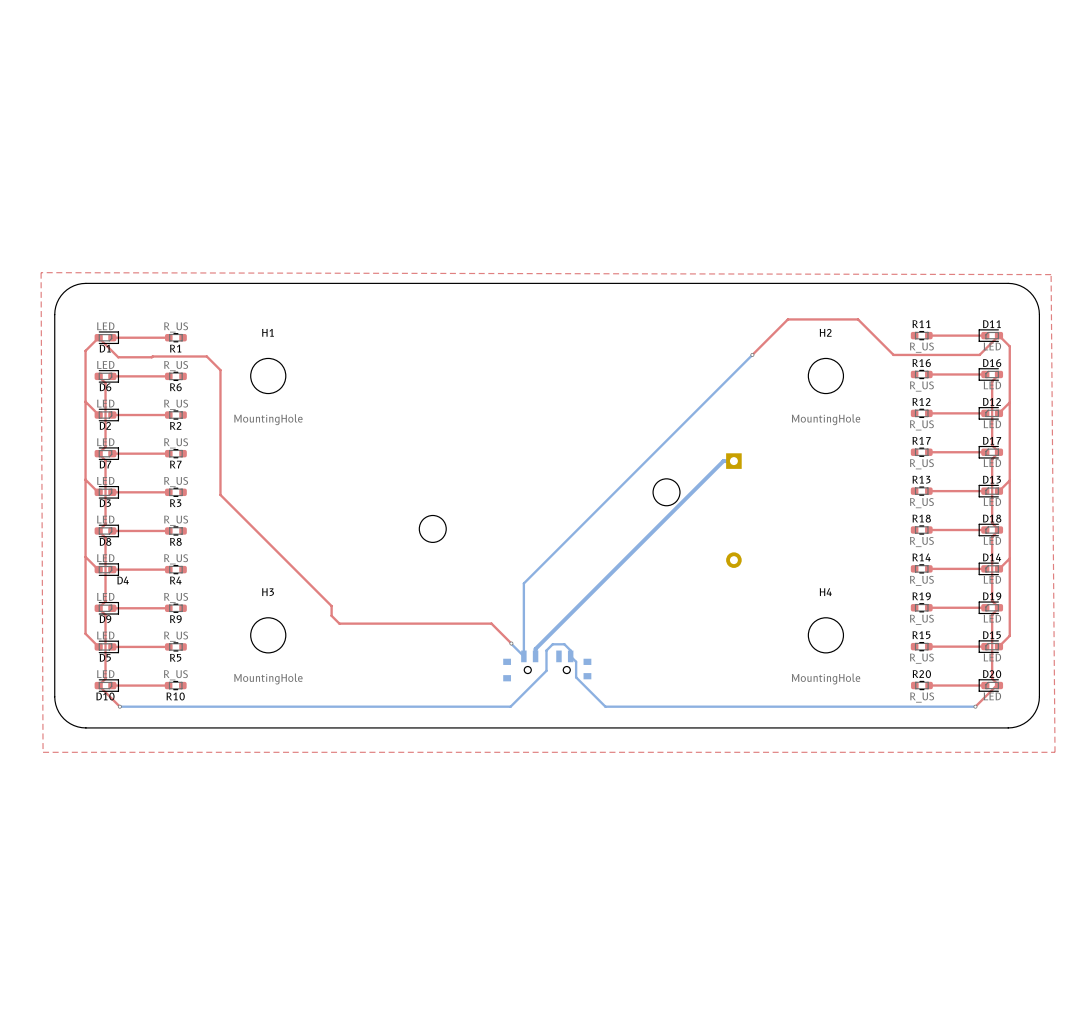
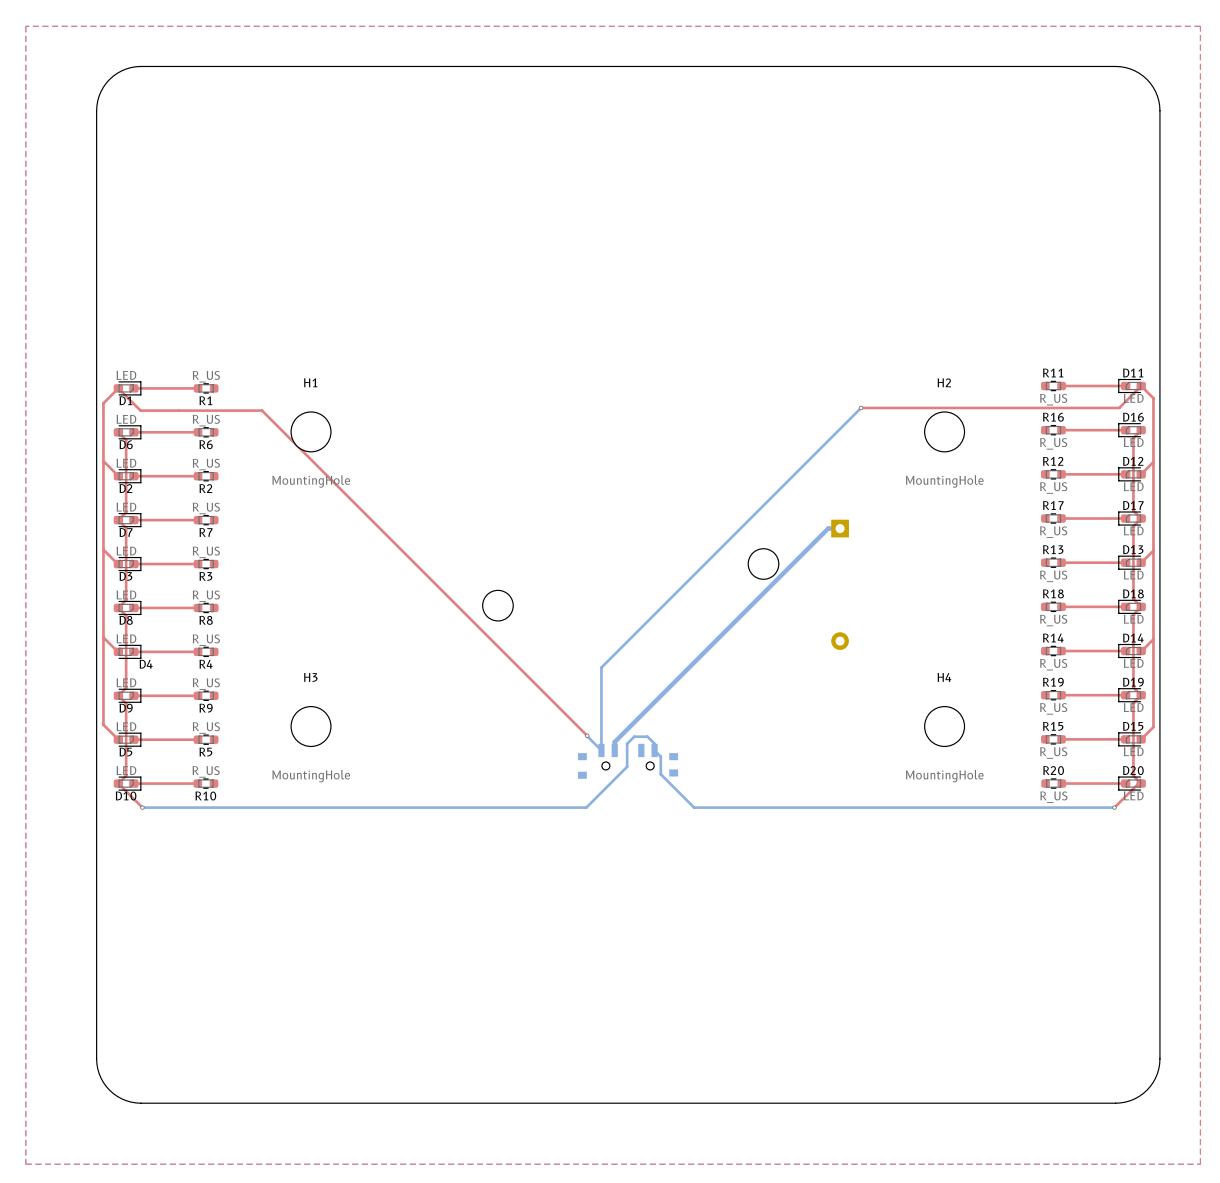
top zone outline: none -> (25, 26) (25, 1164) (1200, 1164) (1200, 26) (25, 26)
board edge: none -> (140, 66) (1115, 66) (1134, 70) (1146, 79) (1155, 91) (1159, 110) (1159, 1058) (1157, 1073) (1146, 1090) (1130, 1100) (1115, 1103) (140, 1103) (126, 1100) (109, 1090) (101, 1078) (96, 1058) (96, 110) (101, 91) (109, 79) (126, 68) (140, 66)
top zone outline: (41, 272) (43, 752) (1055, 752) (1051, 274) (41, 272) -> none
board edge: (85, 283) (1008, 283) (1020, 285) (1032, 295) (1037, 302) (1039, 314) (1039, 696) (1037, 708) (1027, 721) (1020, 725) (1008, 727) (85, 727) (74, 725) (61, 715) (57, 708) (54, 696) (54, 314) (57, 302) (63, 292) (74, 285) (85, 283) -> none
top track: (752, 354) (787, 319) (858, 319) (893, 354) -> (861, 407) (1021, 407)
top track: (151, 357) (206, 356) (220, 370) (220, 494) (331, 606) (331, 615) (339, 623) (491, 623) -> (178, 410) (262, 410) (564, 713)

